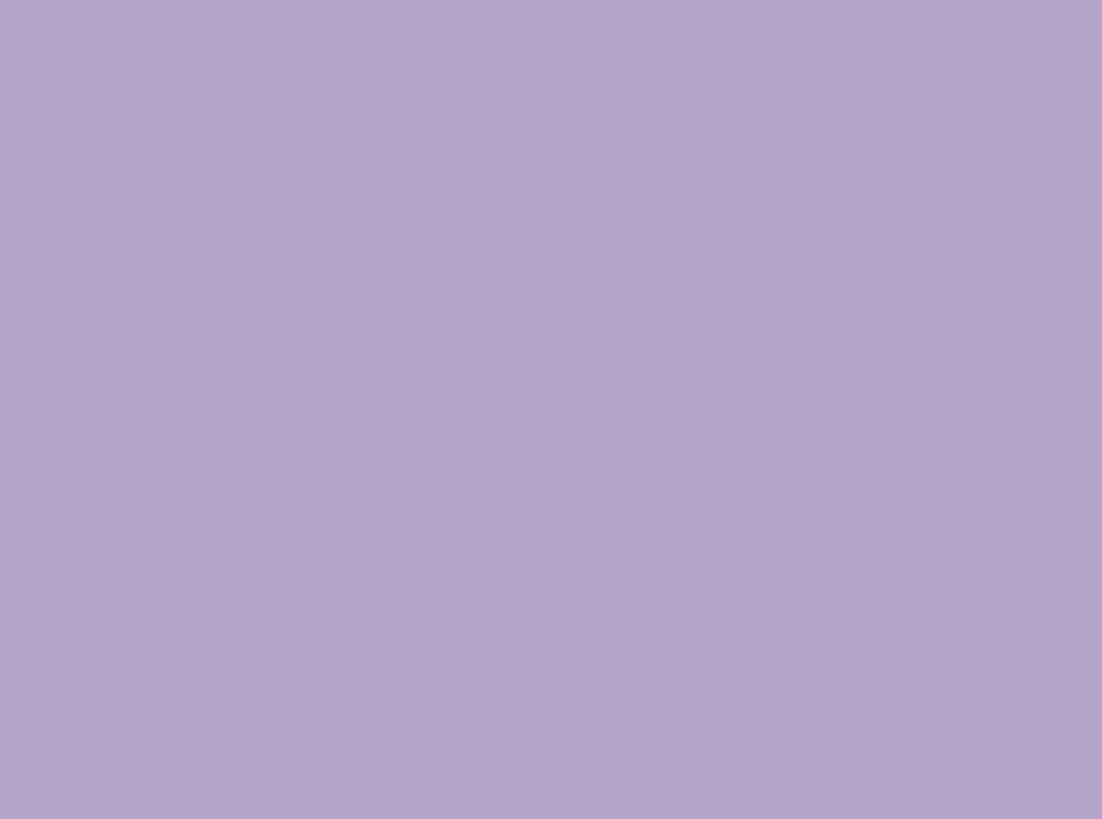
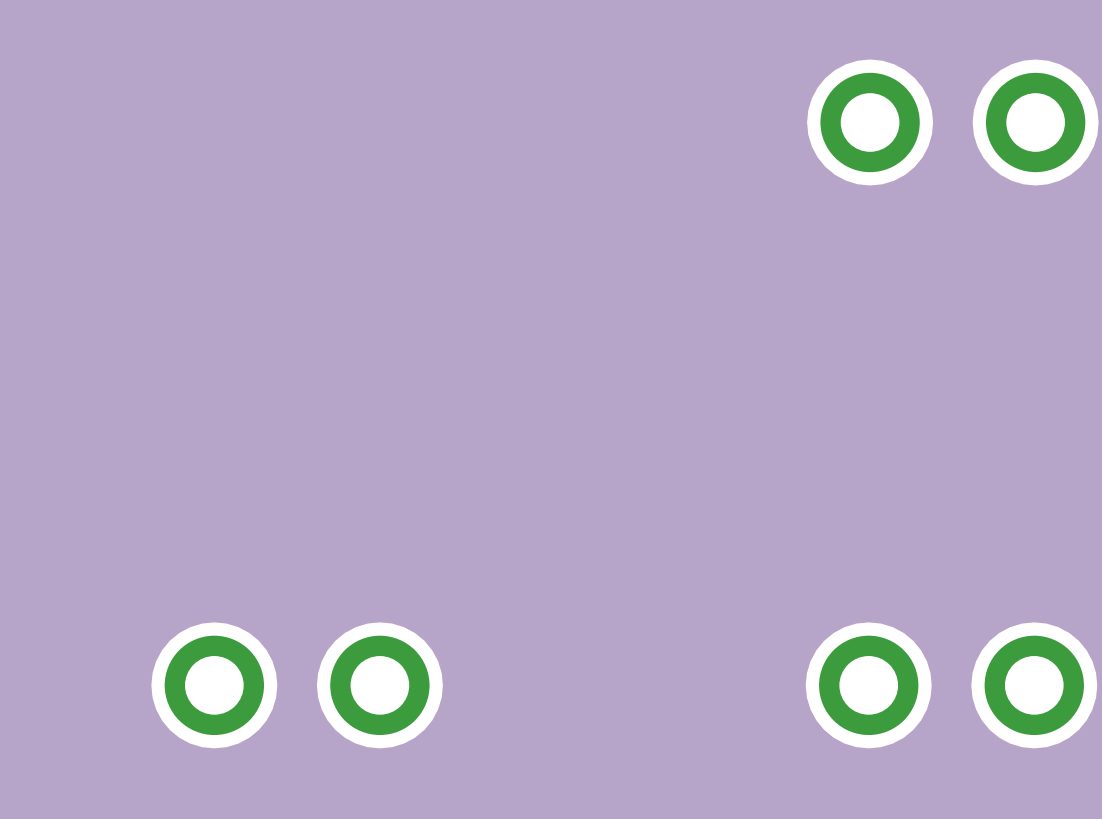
part: none -> (952, 122)
part: none -> (297, 685)
part: none -> (951, 685)

